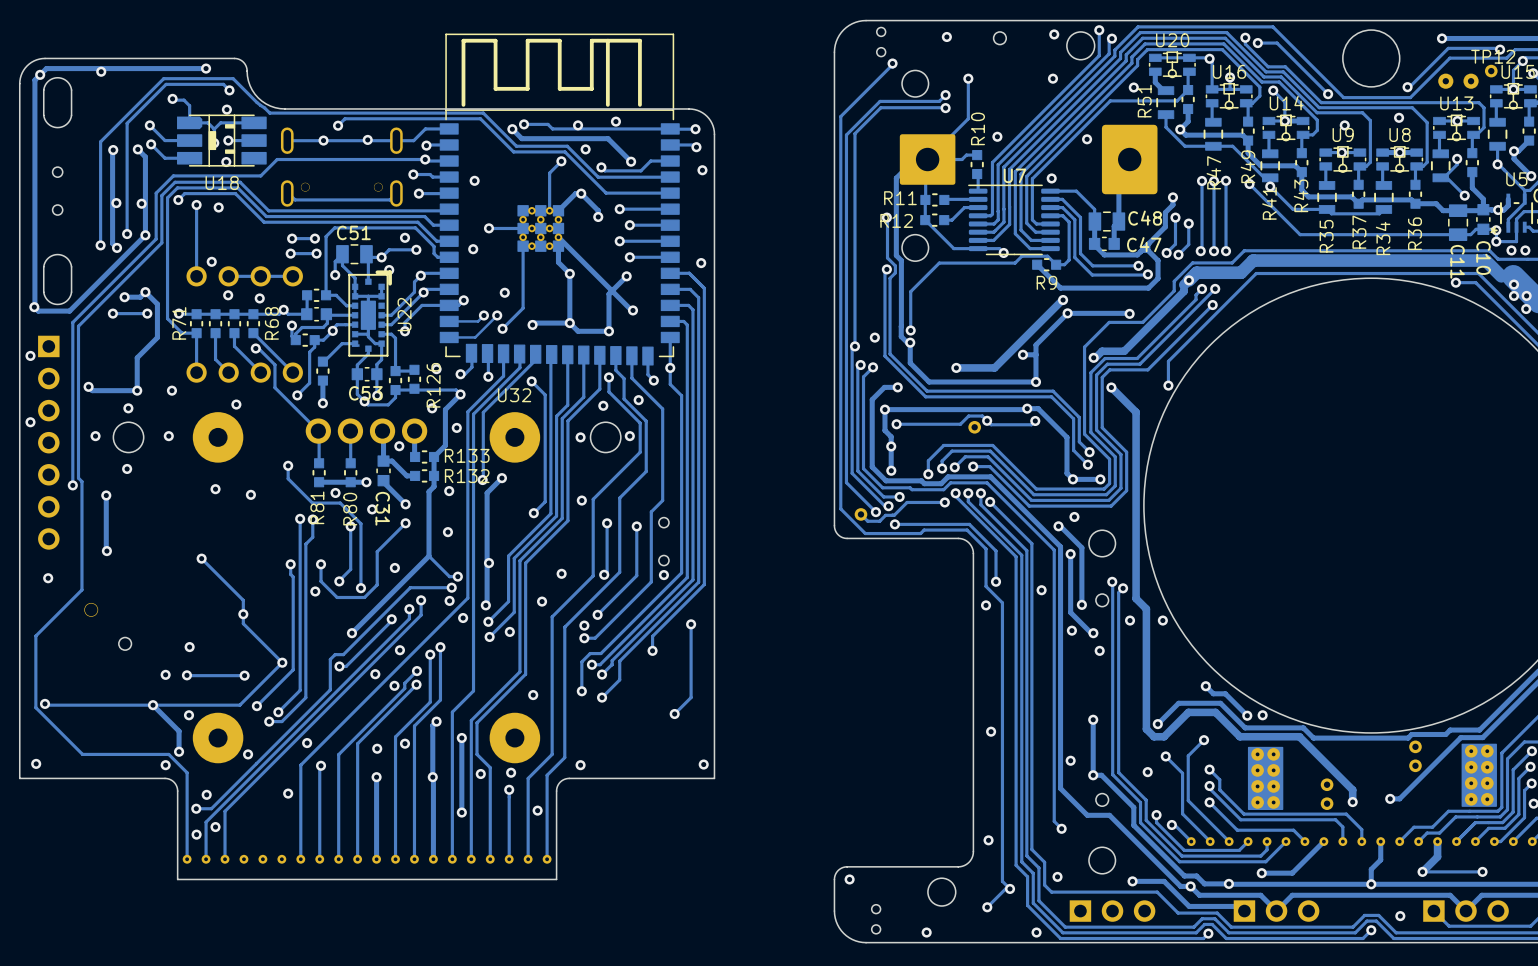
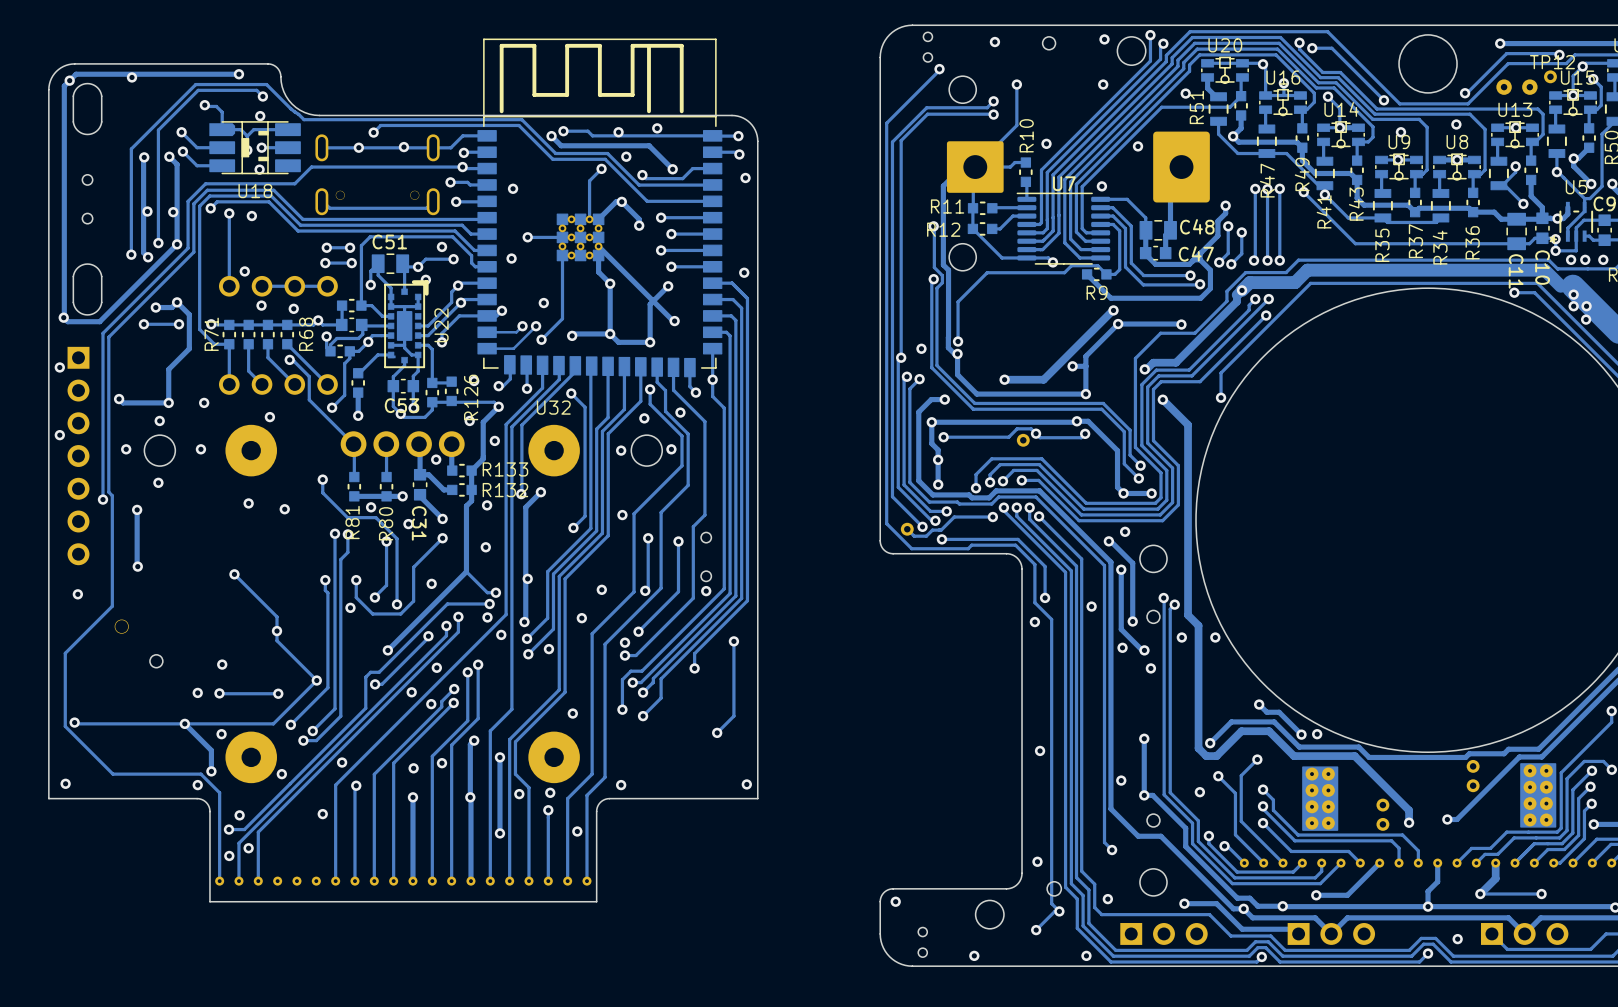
round board edge: none -> [1046, 881, 1062, 897]

